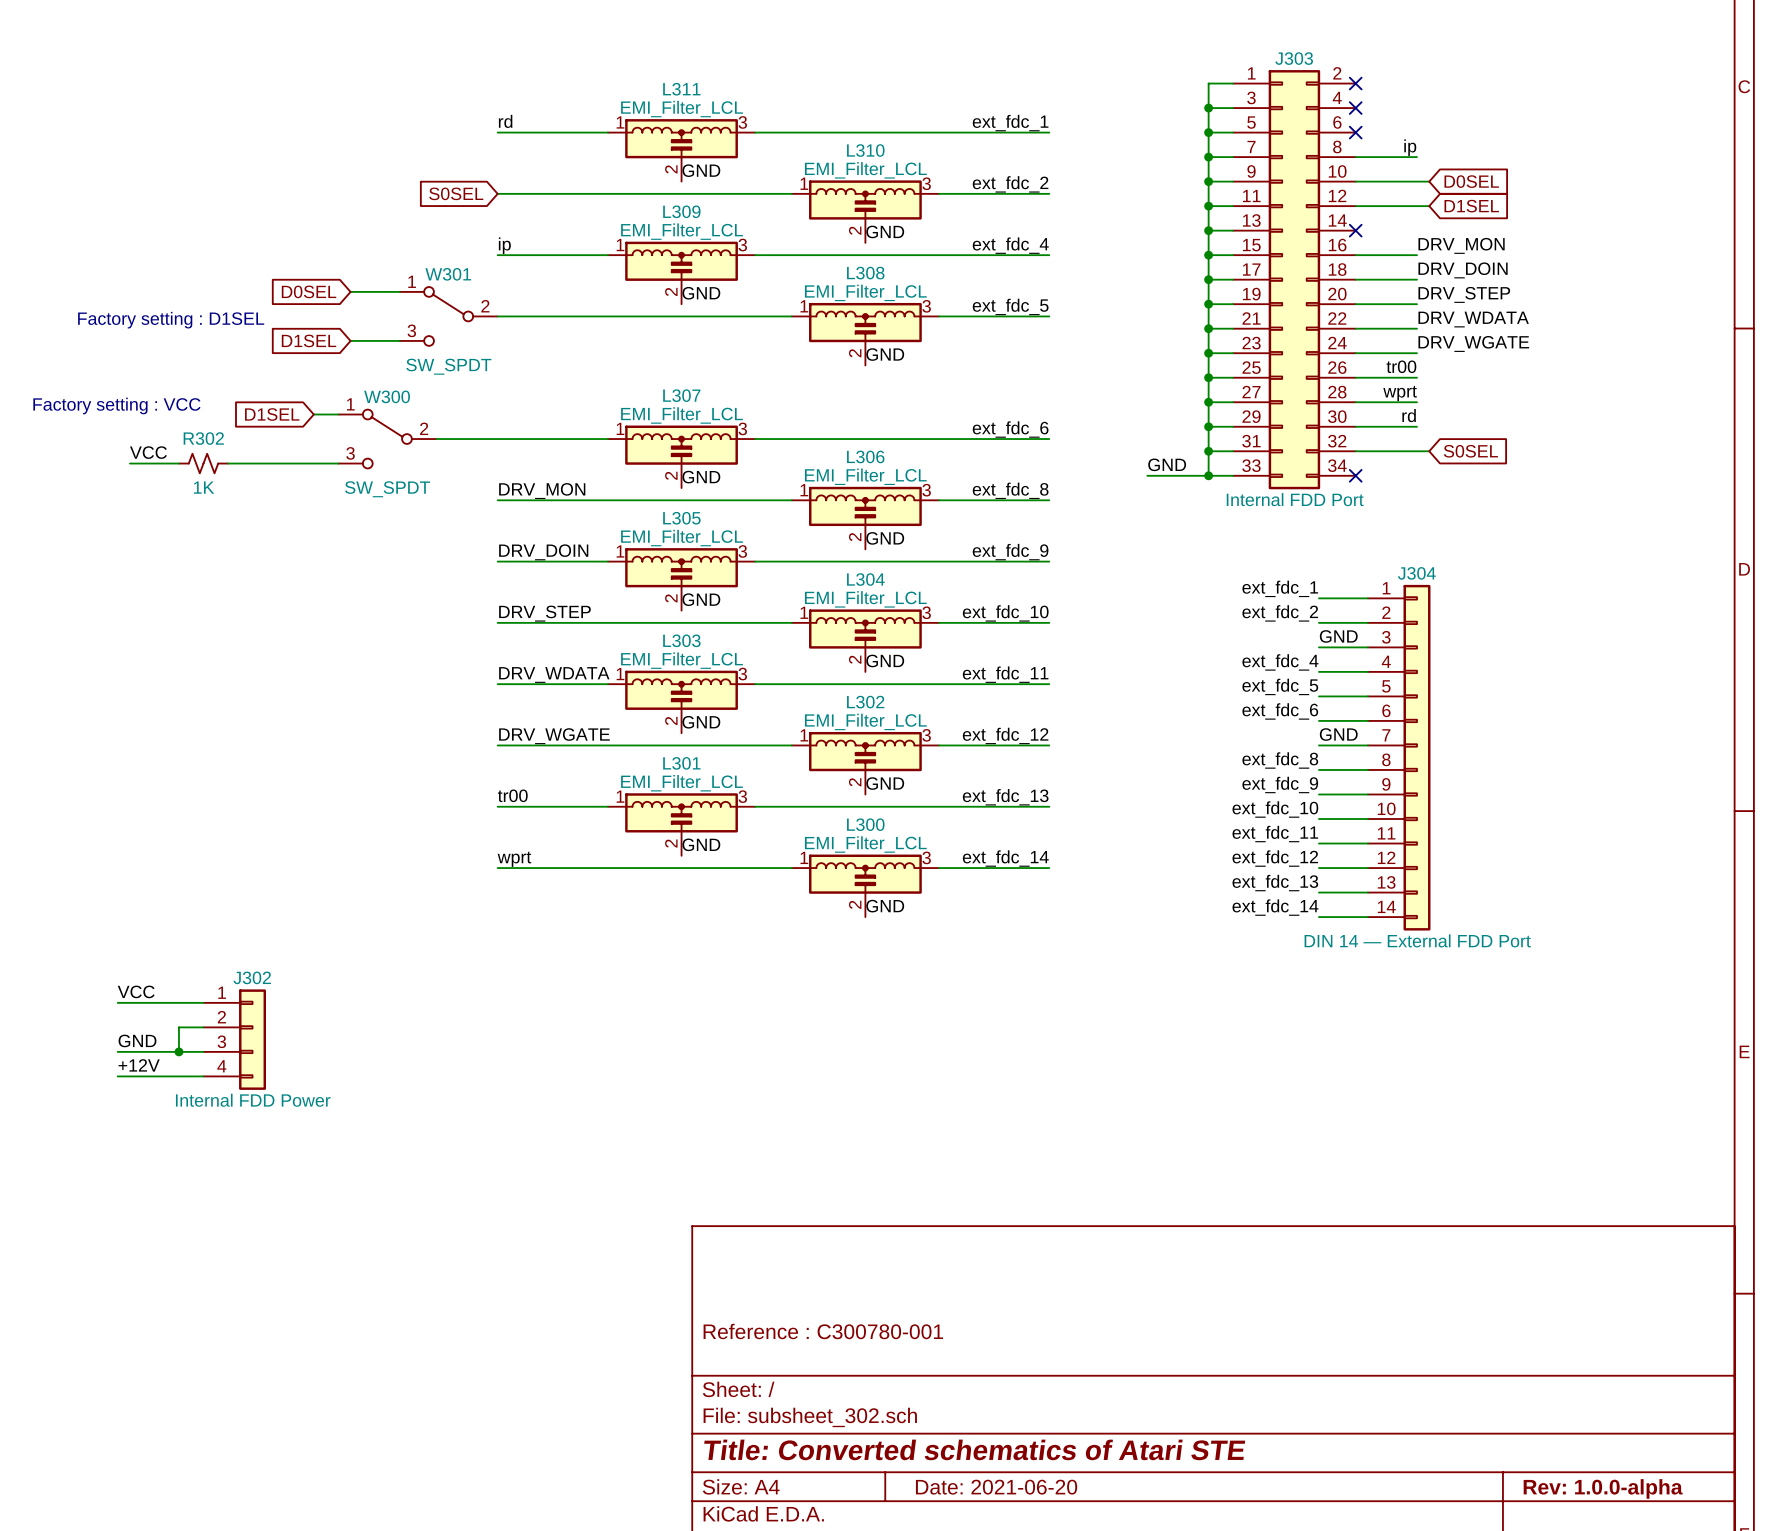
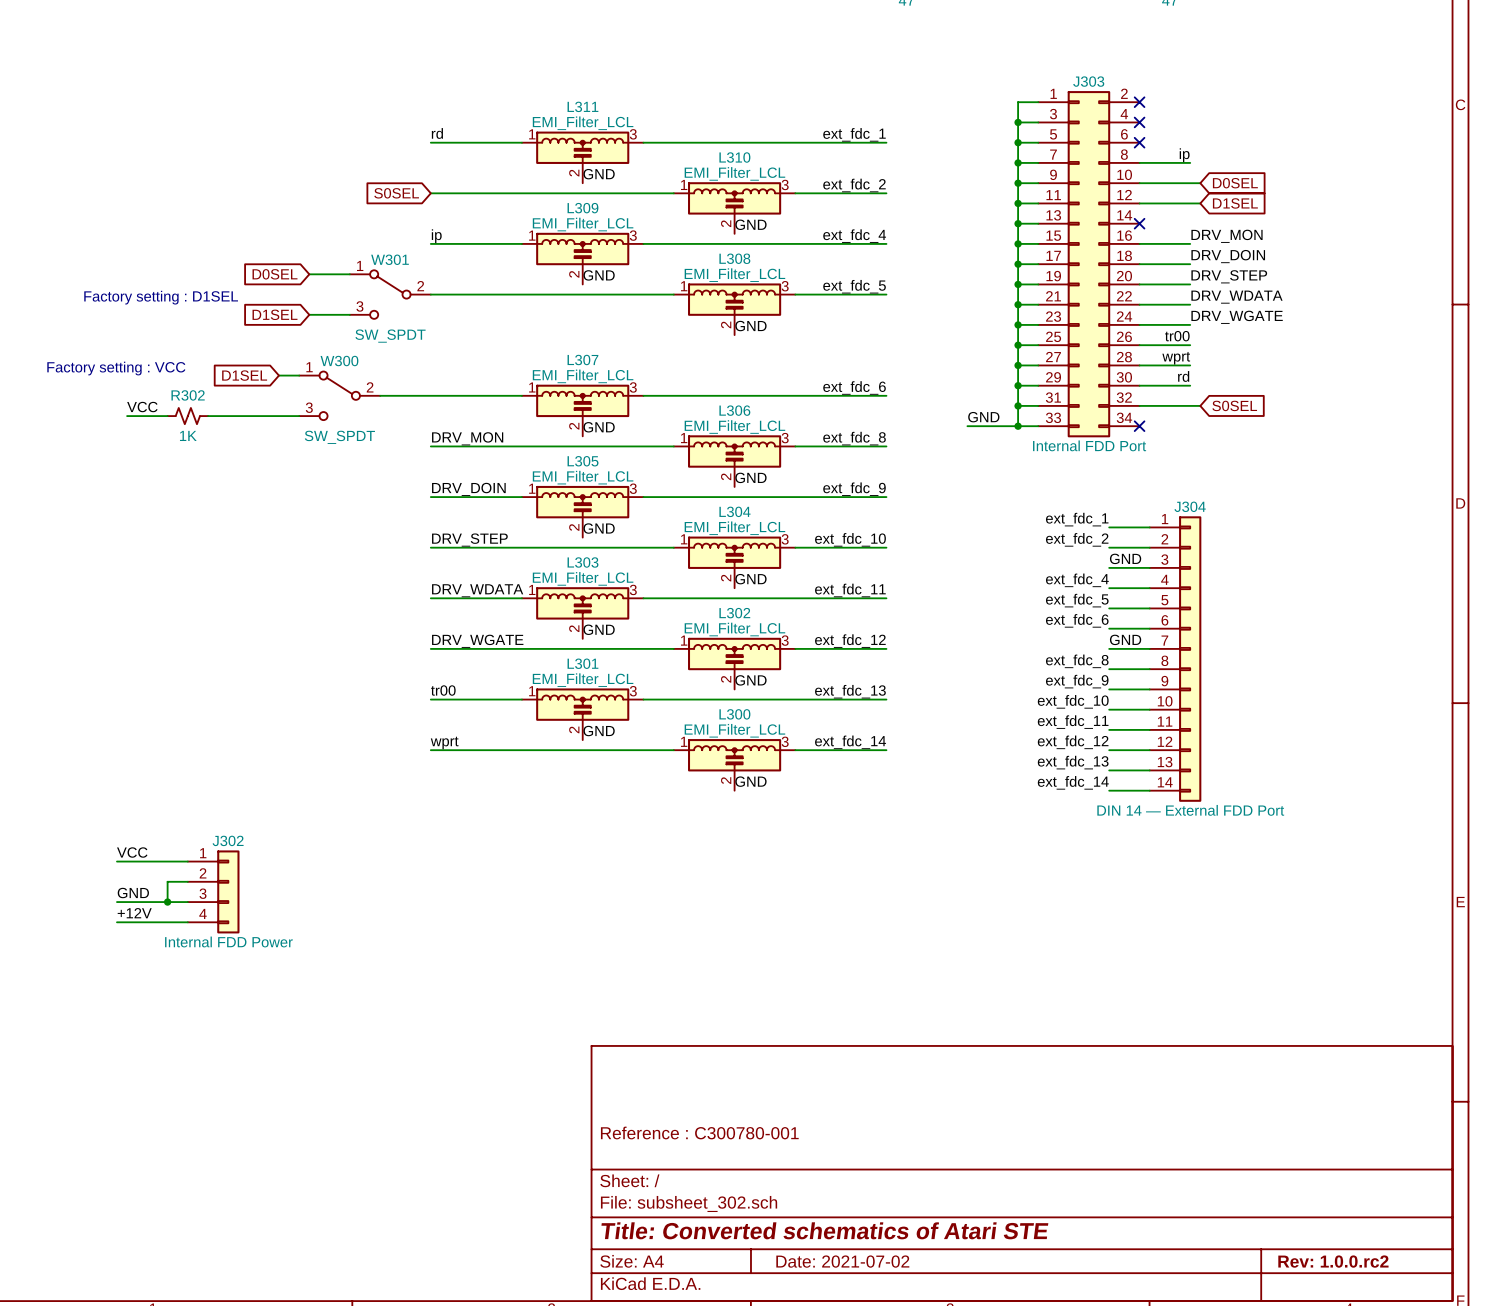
title block: Date: 2021-06-20 (996, 1487) -> Date: 2021-07-02 (842, 1261)
title block: Rev: 1.0.0-alpha (1603, 1488) -> Rev: 1.0.0.rc2 (1333, 1261)

